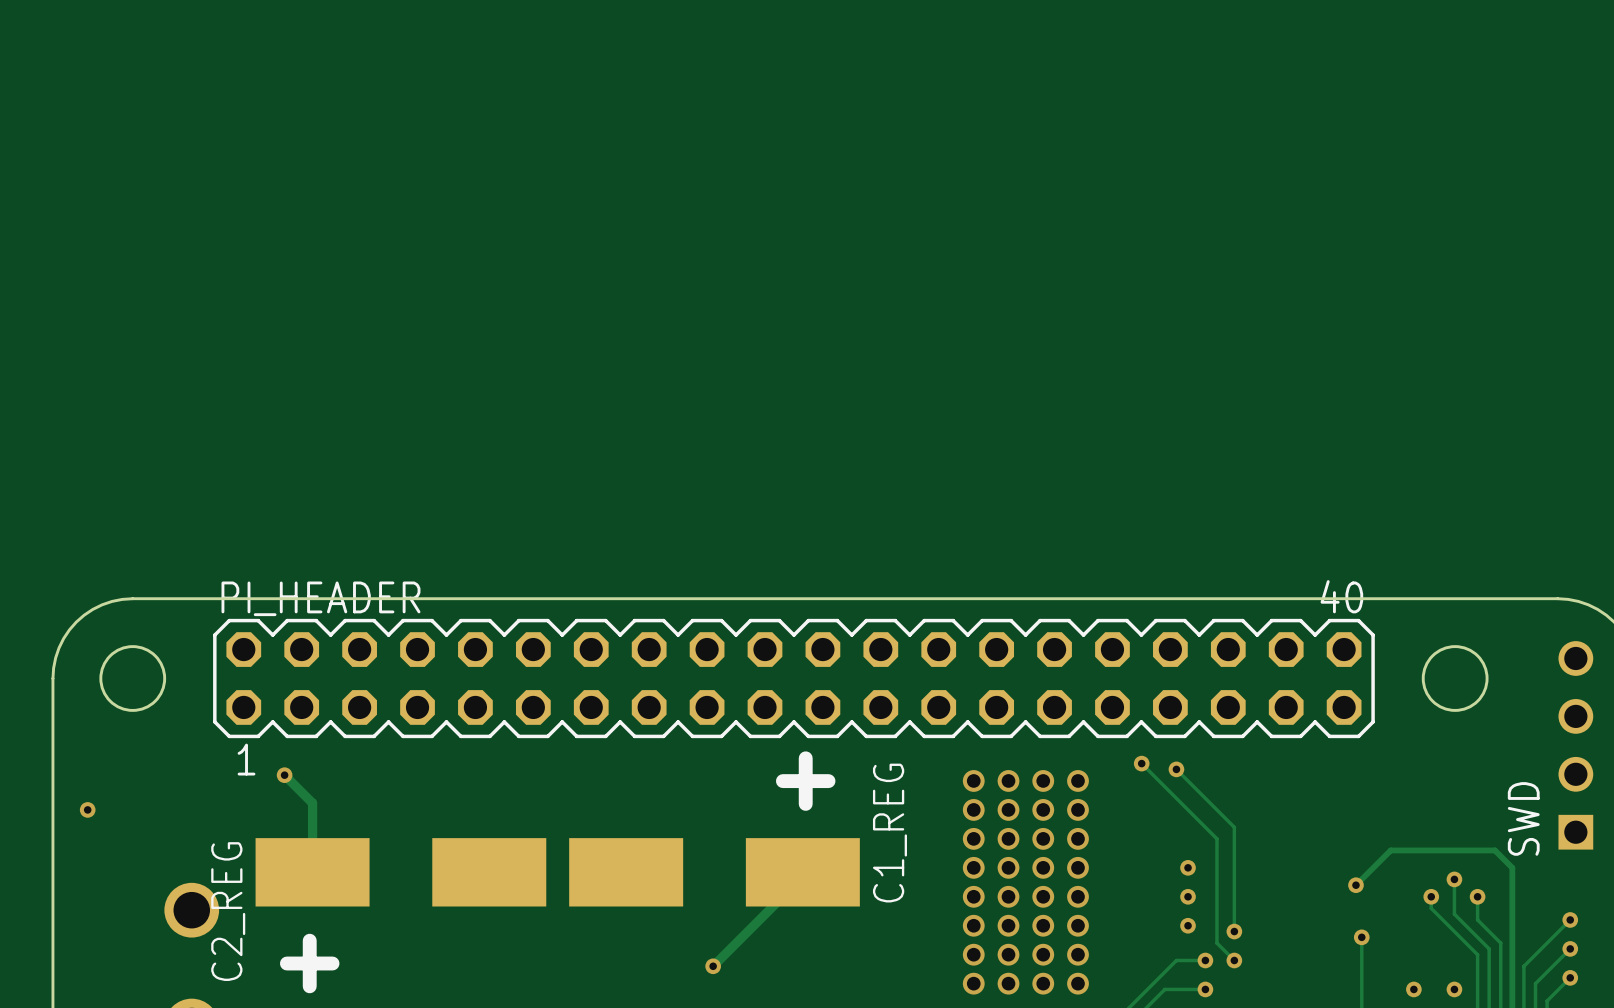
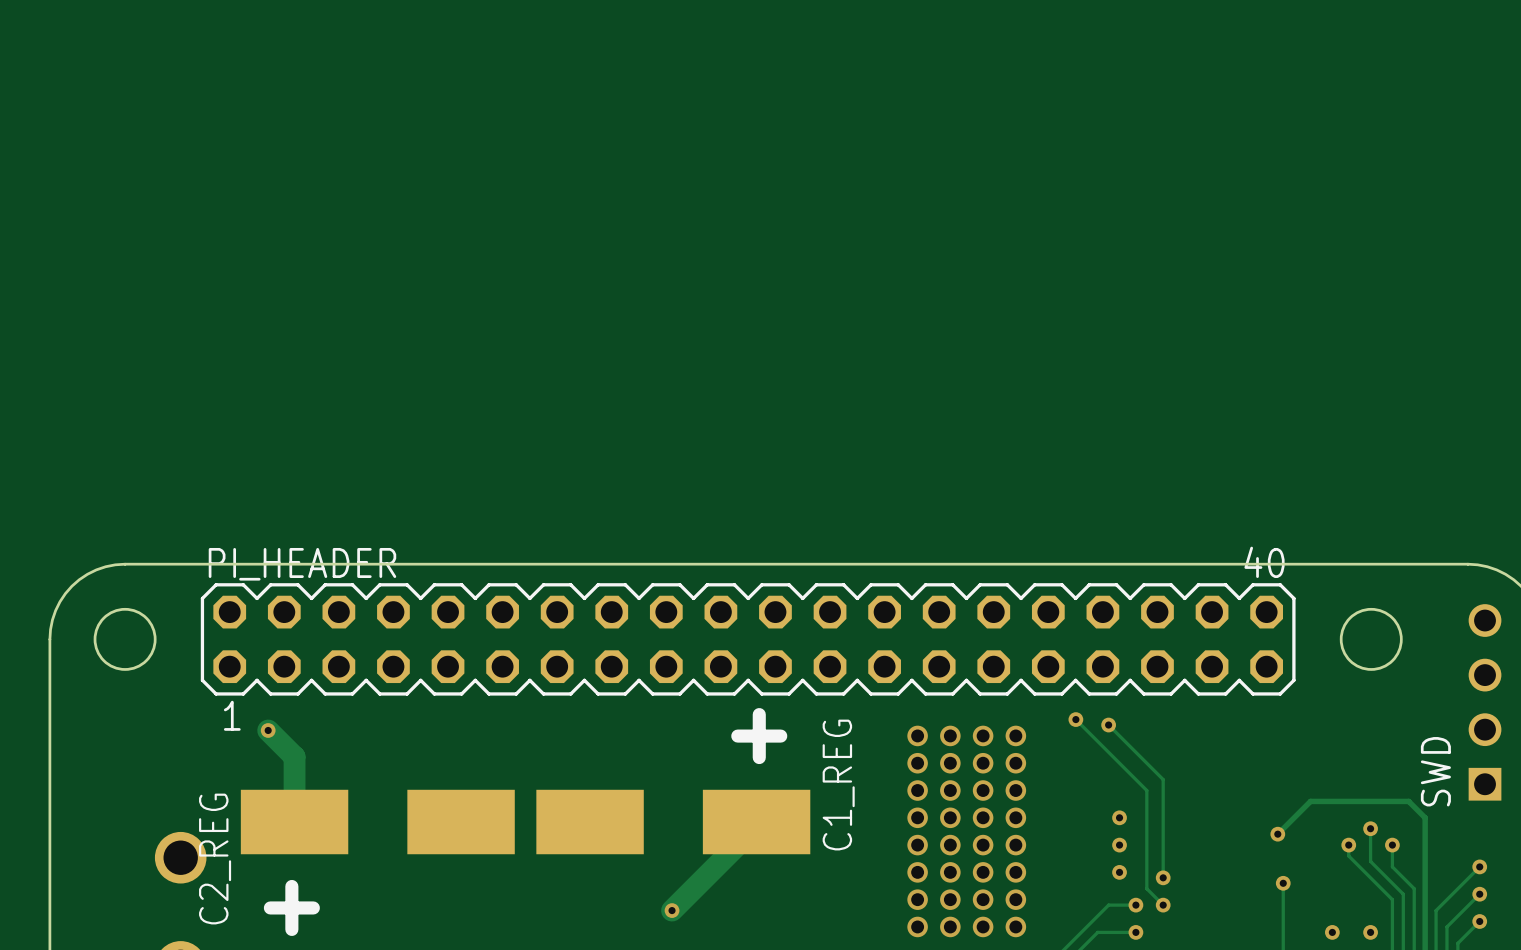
track width: thin (284, 775) (312, 803) (312, 872) -> thick (268, 730) (294, 756) (294, 822)
via: (87, 809) -> none
track width: thin (802, 872) (785, 893) (713, 966) -> thick (756, 822) (740, 842) (672, 910)

